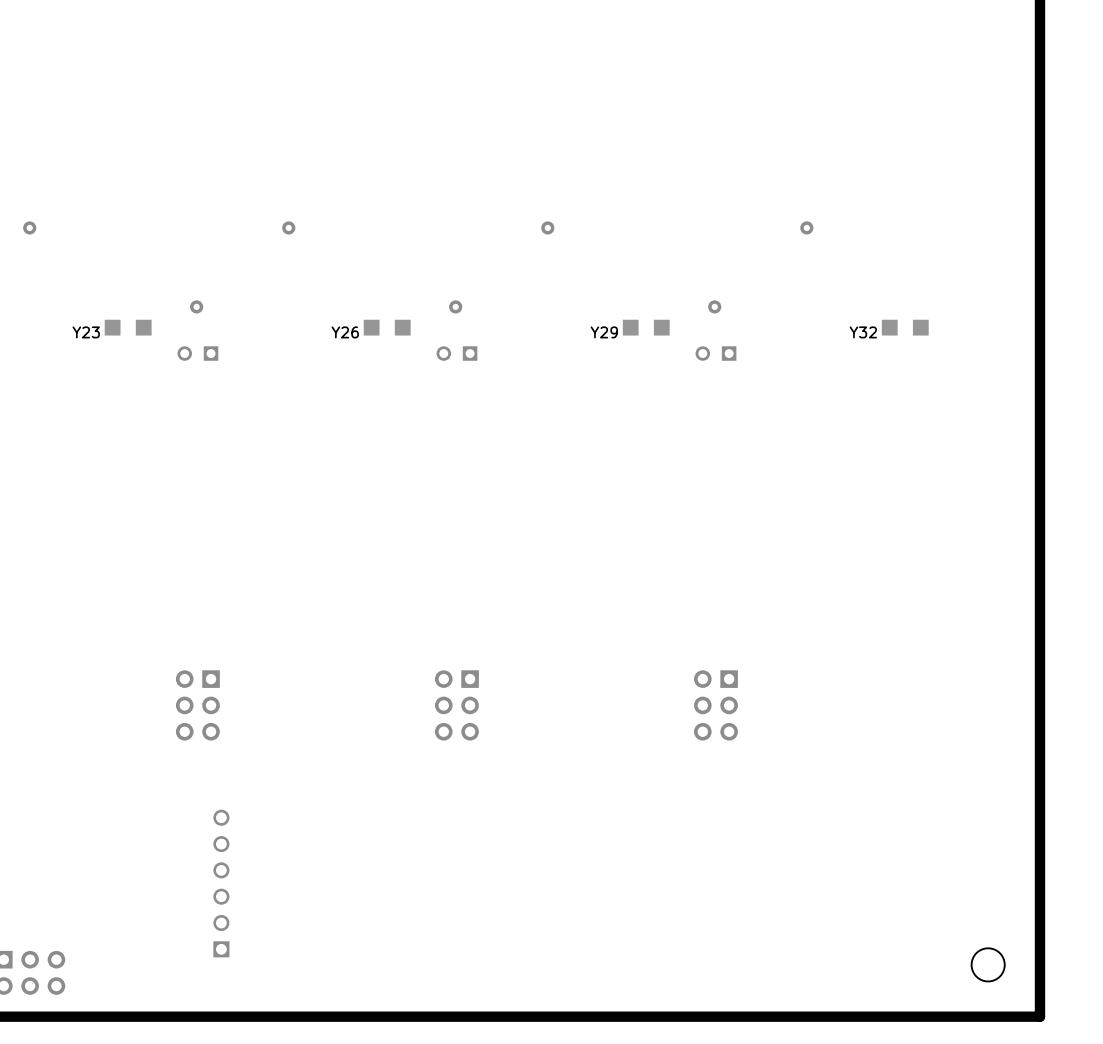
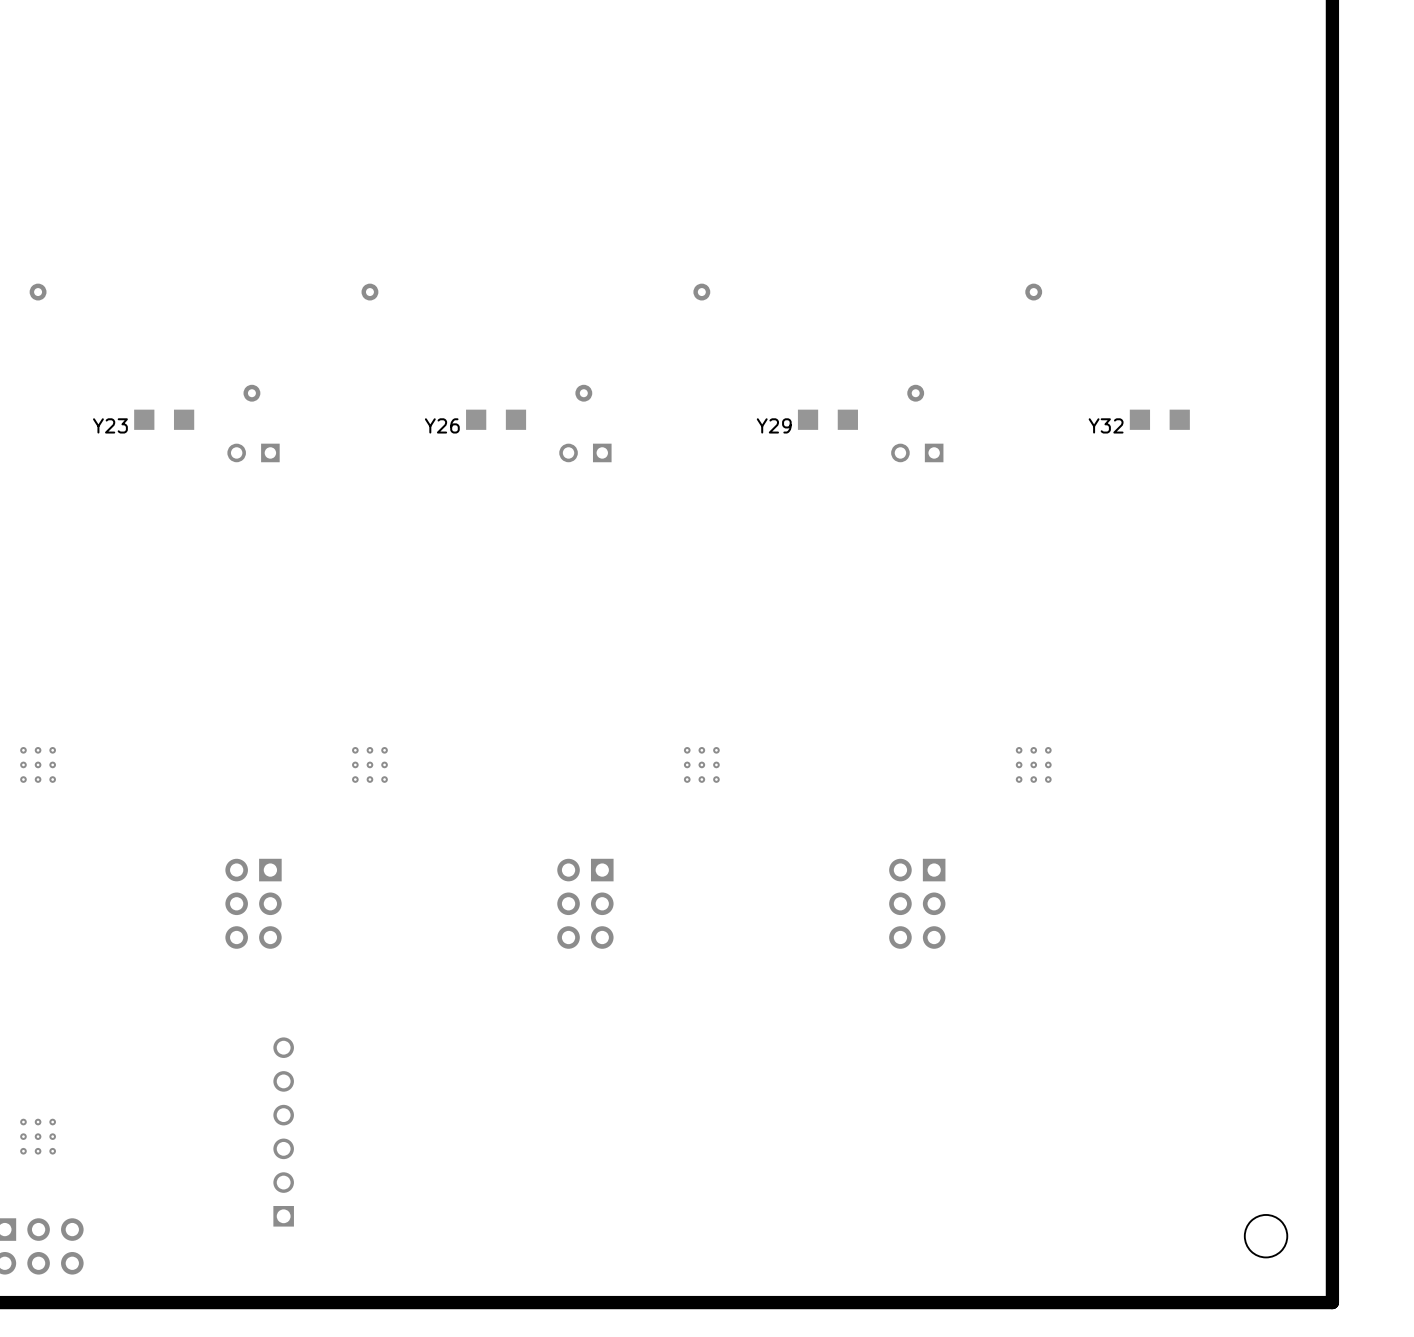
part: none -> (38, 764)
part: none -> (369, 764)
part: none -> (701, 764)
part: none -> (1033, 764)
part: none -> (38, 1136)

